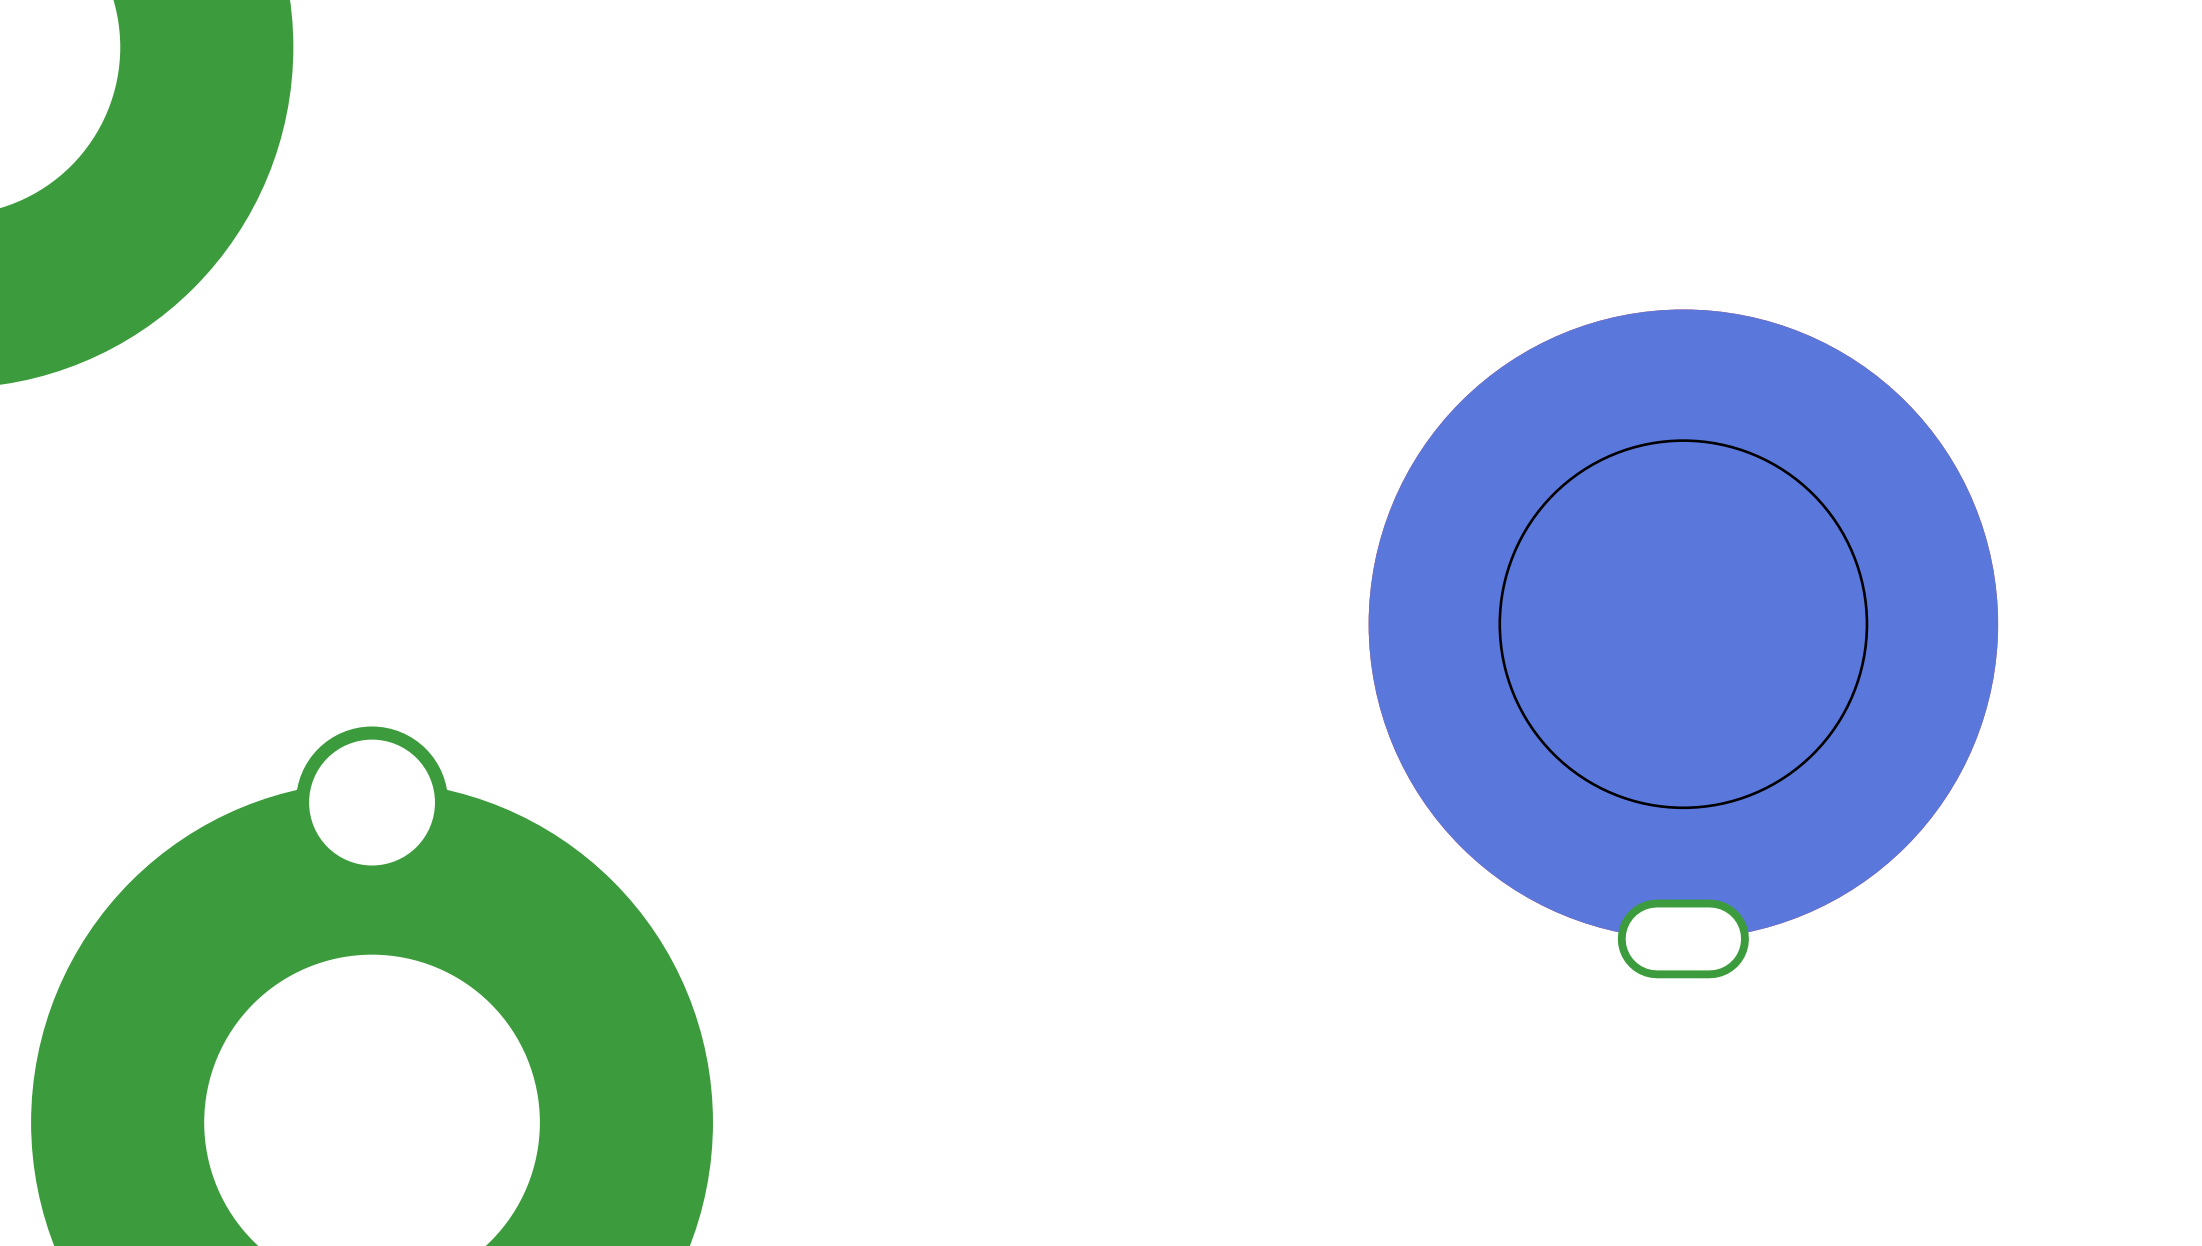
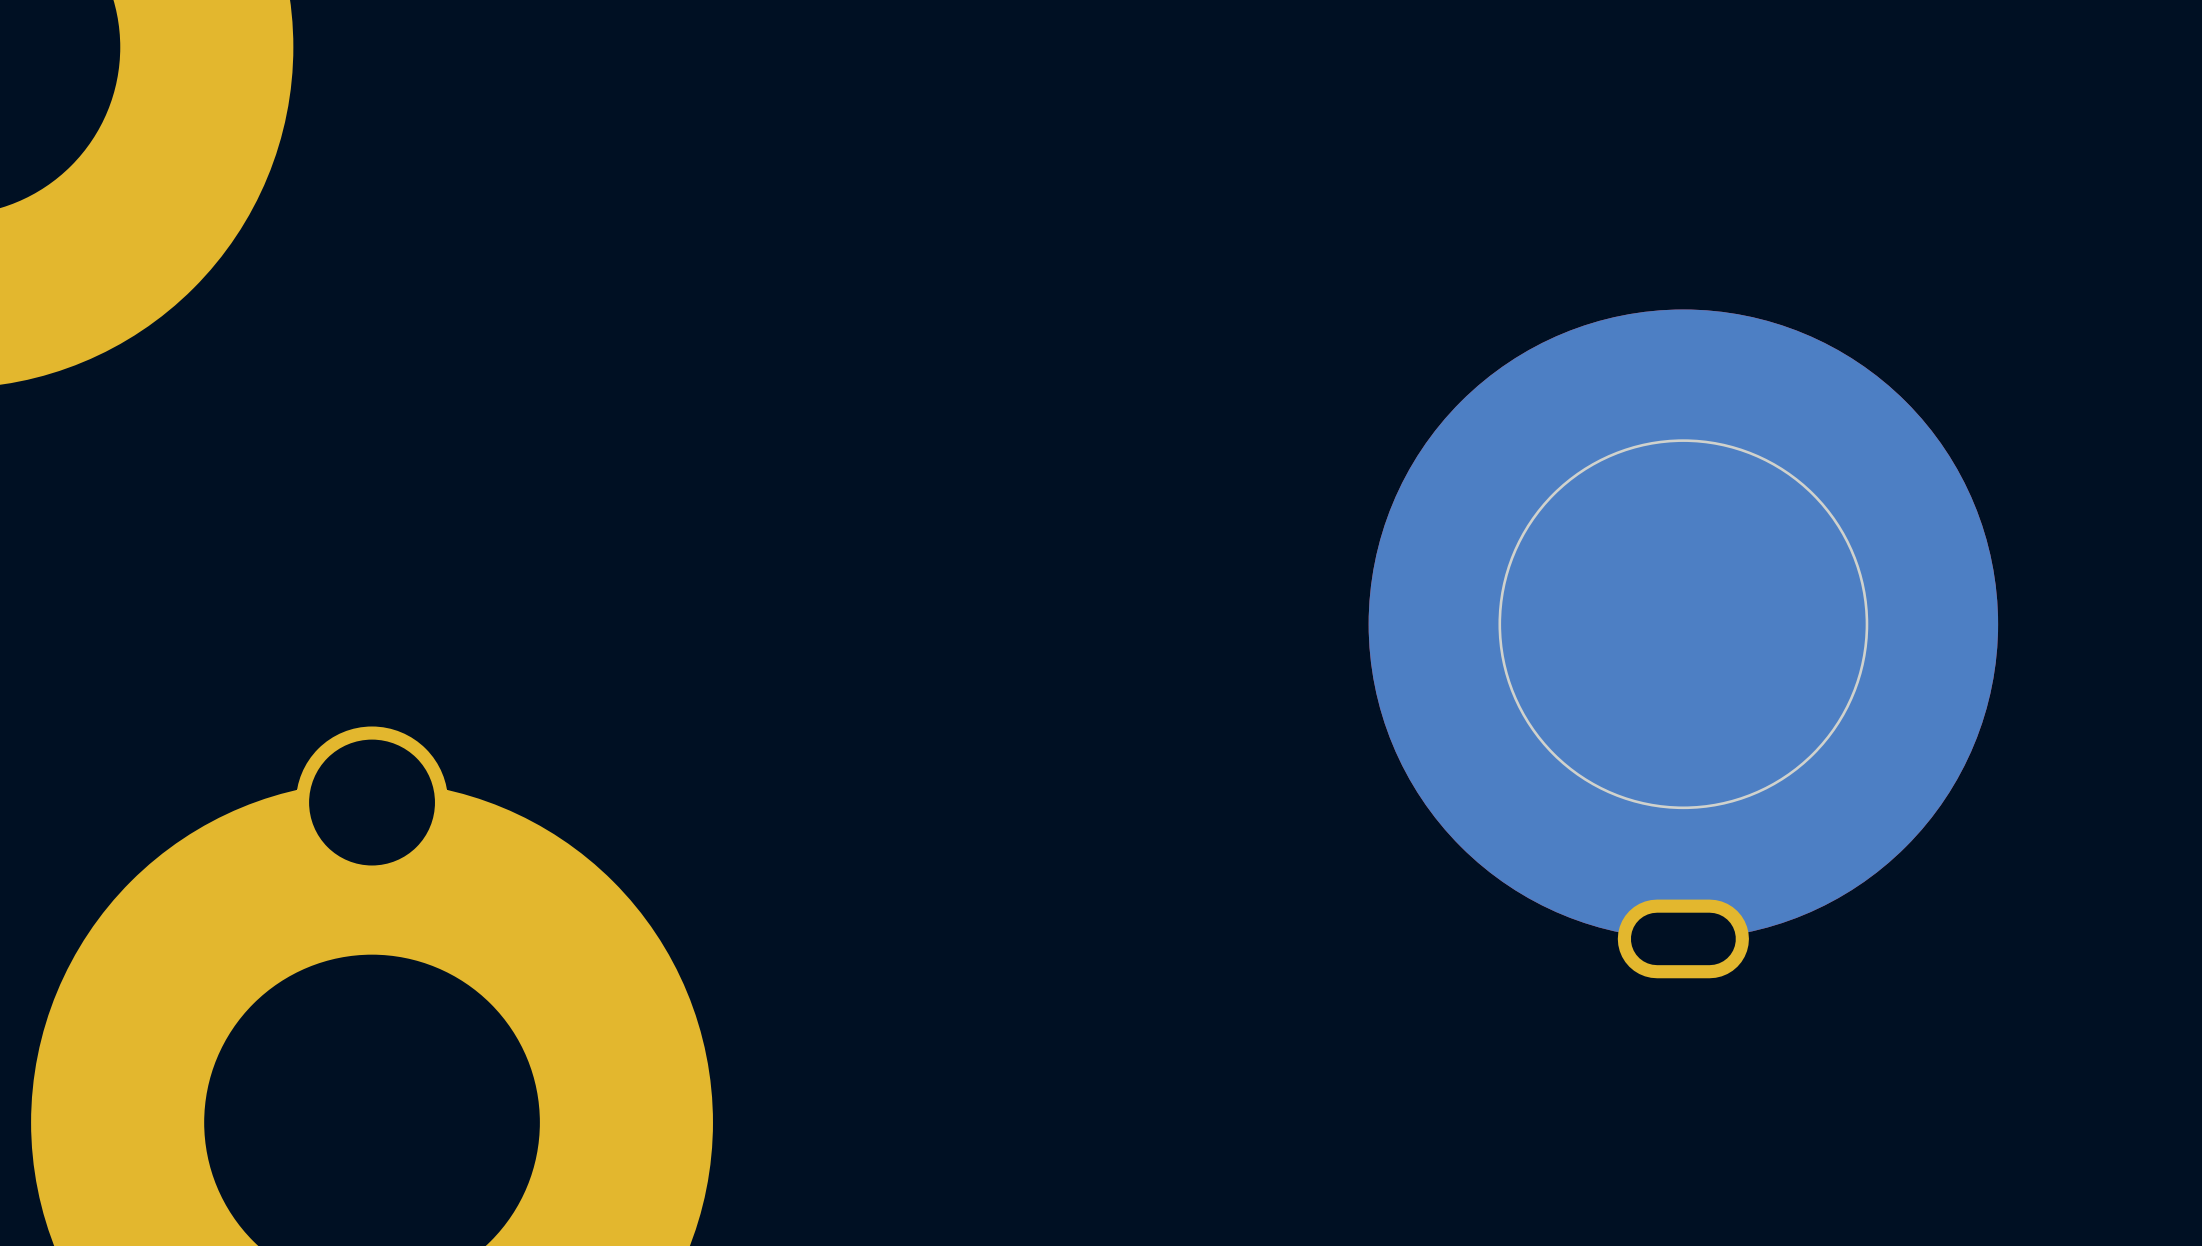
part footprint: [1368, 309, 1999, 979] -> [1368, 309, 1999, 979]

